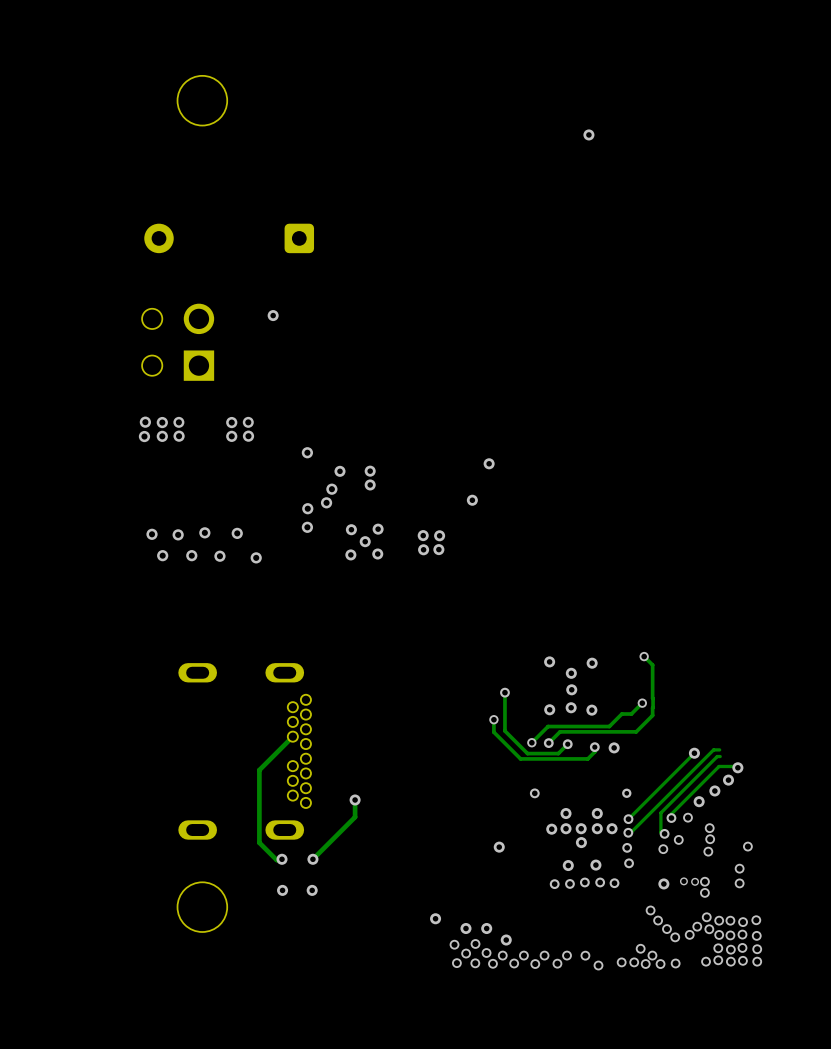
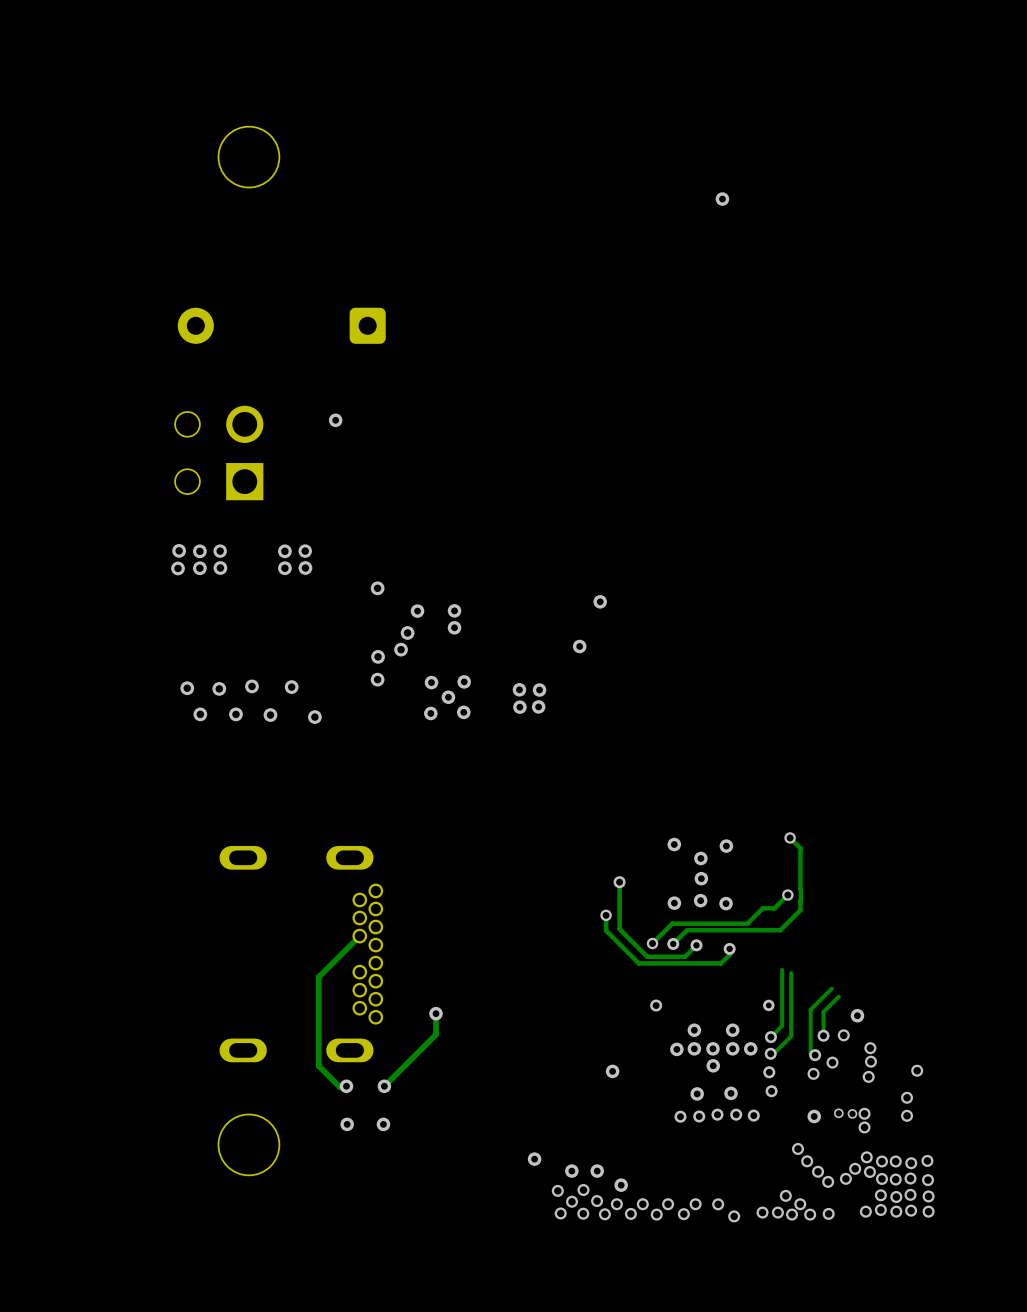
via: (614, 747) -> none
track: (719, 749) (713, 749) (645, 818) -> (791, 973) (791, 1036)
track: (694, 753) (637, 809) -> (782, 969) (782, 1025)
via: (694, 753) -> none
track: (720, 756) (717, 756) (660, 812) -> (831, 988) (810, 1009) (810, 1029)
track: (737, 767) (719, 766) (671, 814) -> (838, 996) (823, 1012) (823, 1030)
via: (737, 767) -> none
via: (728, 780) -> none
via: (714, 790) -> none

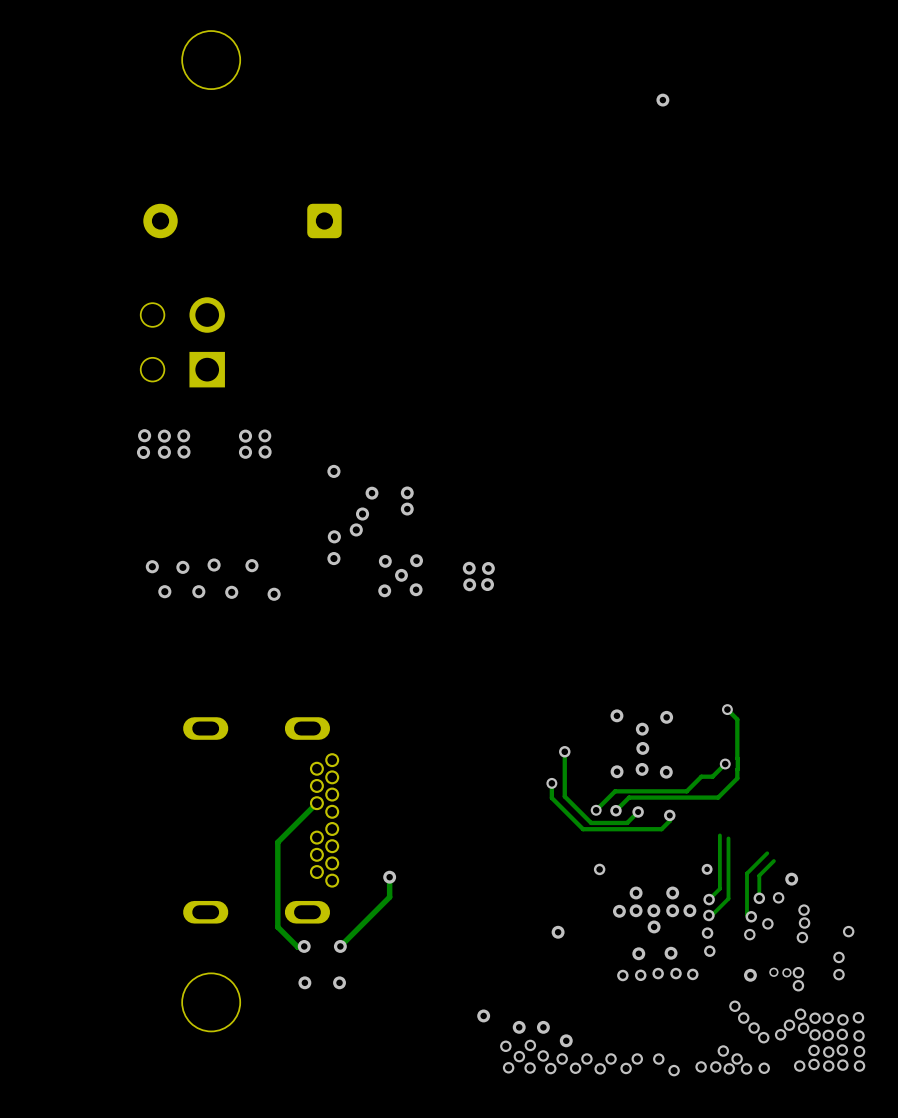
via: (335, 420) -> none
via: (600, 601) -> none
via: (579, 646) -> none

